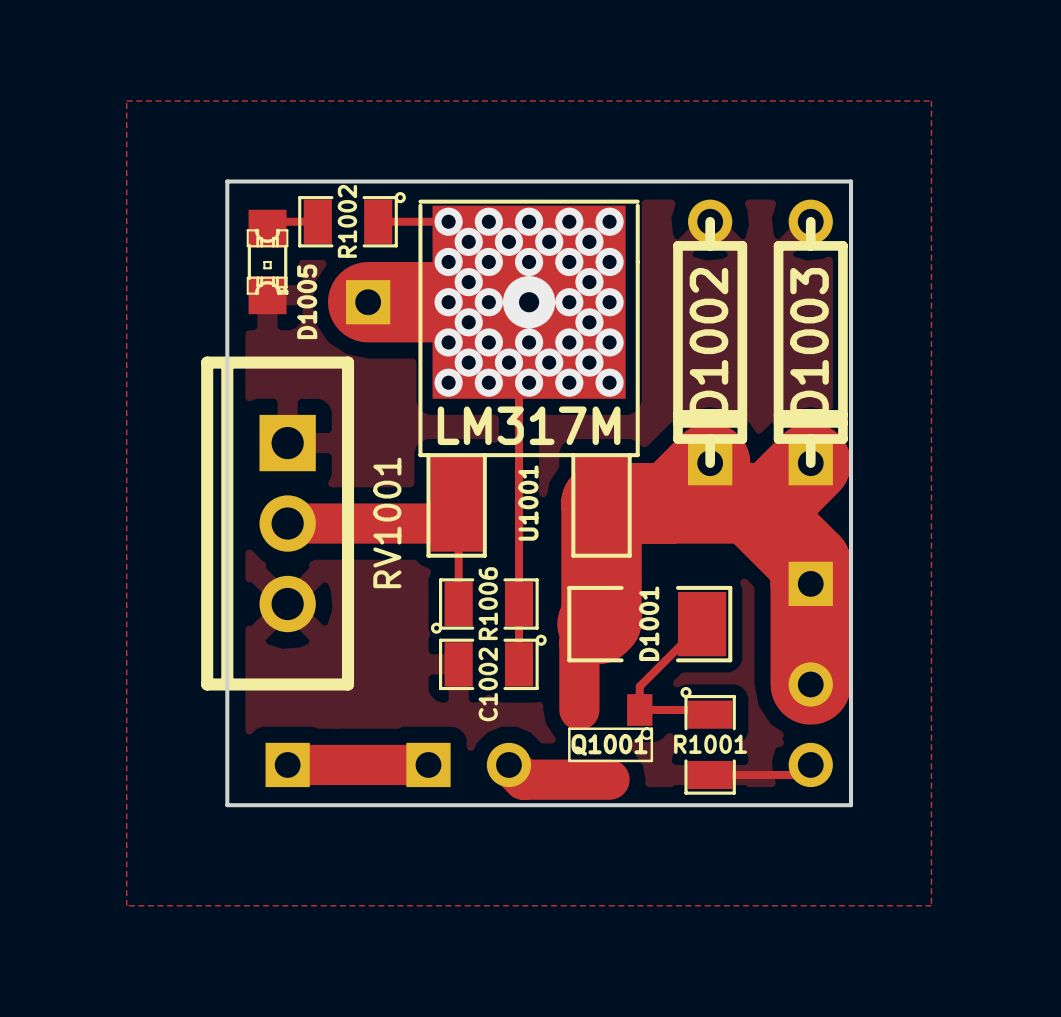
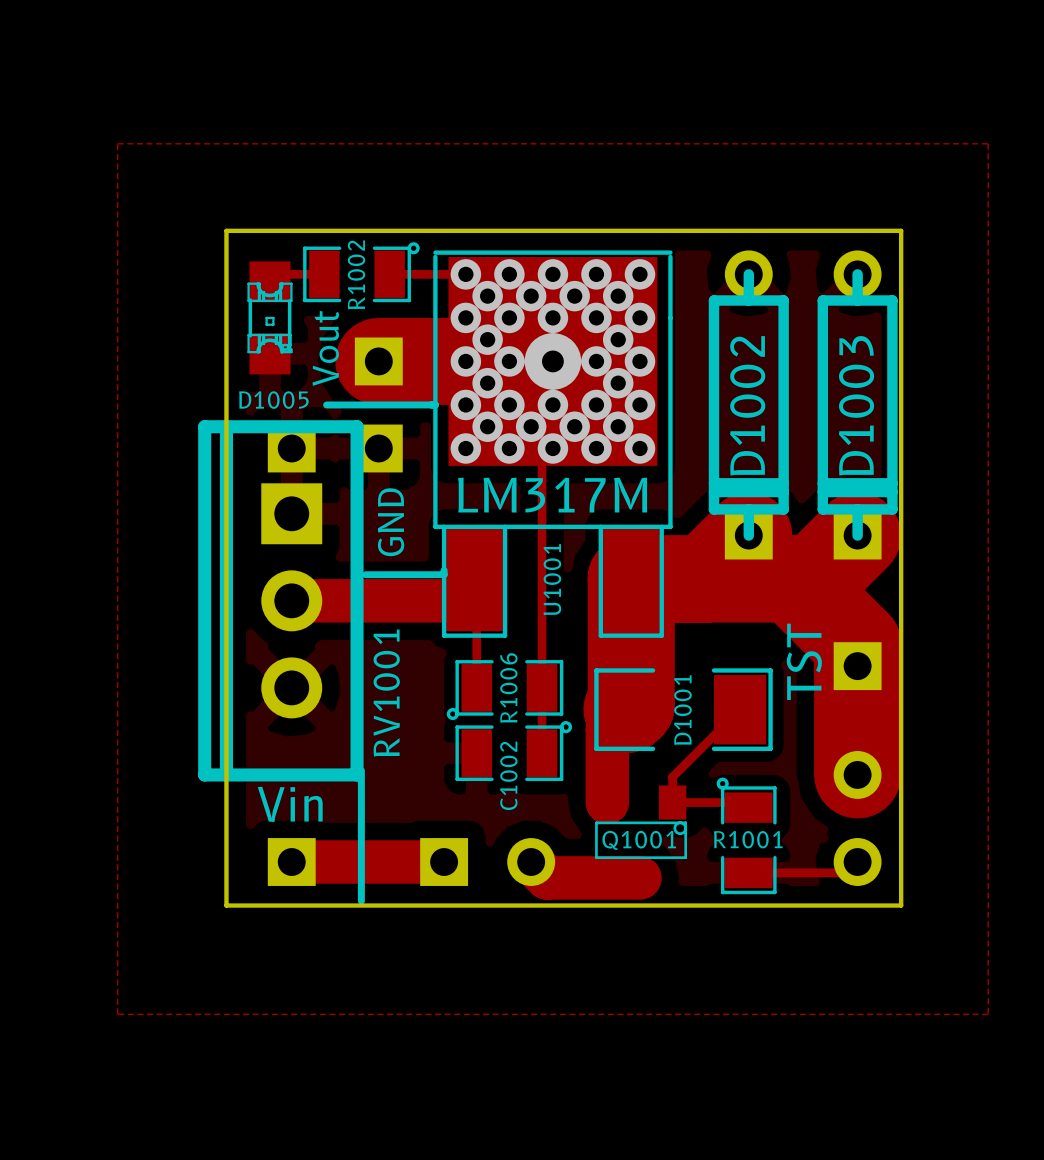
text: none -> Vout (325, 348)
D1005 name rotation: 0° (307, 301) -> 90° clockwise (273, 400)
line: none -> (326, 404) (435, 404)
part: none -> (291, 448)
part: none -> (378, 448)
text: none -> GND (391, 522)
line: none -> (444, 570) (444, 574) (365, 574)
RV1001 name position: RV1001 (387, 522) -> RV1001 (386, 693)
text: none -> TST (804, 661)
line: none -> (361, 770) (361, 901)
text: none -> Vin (290, 804)

